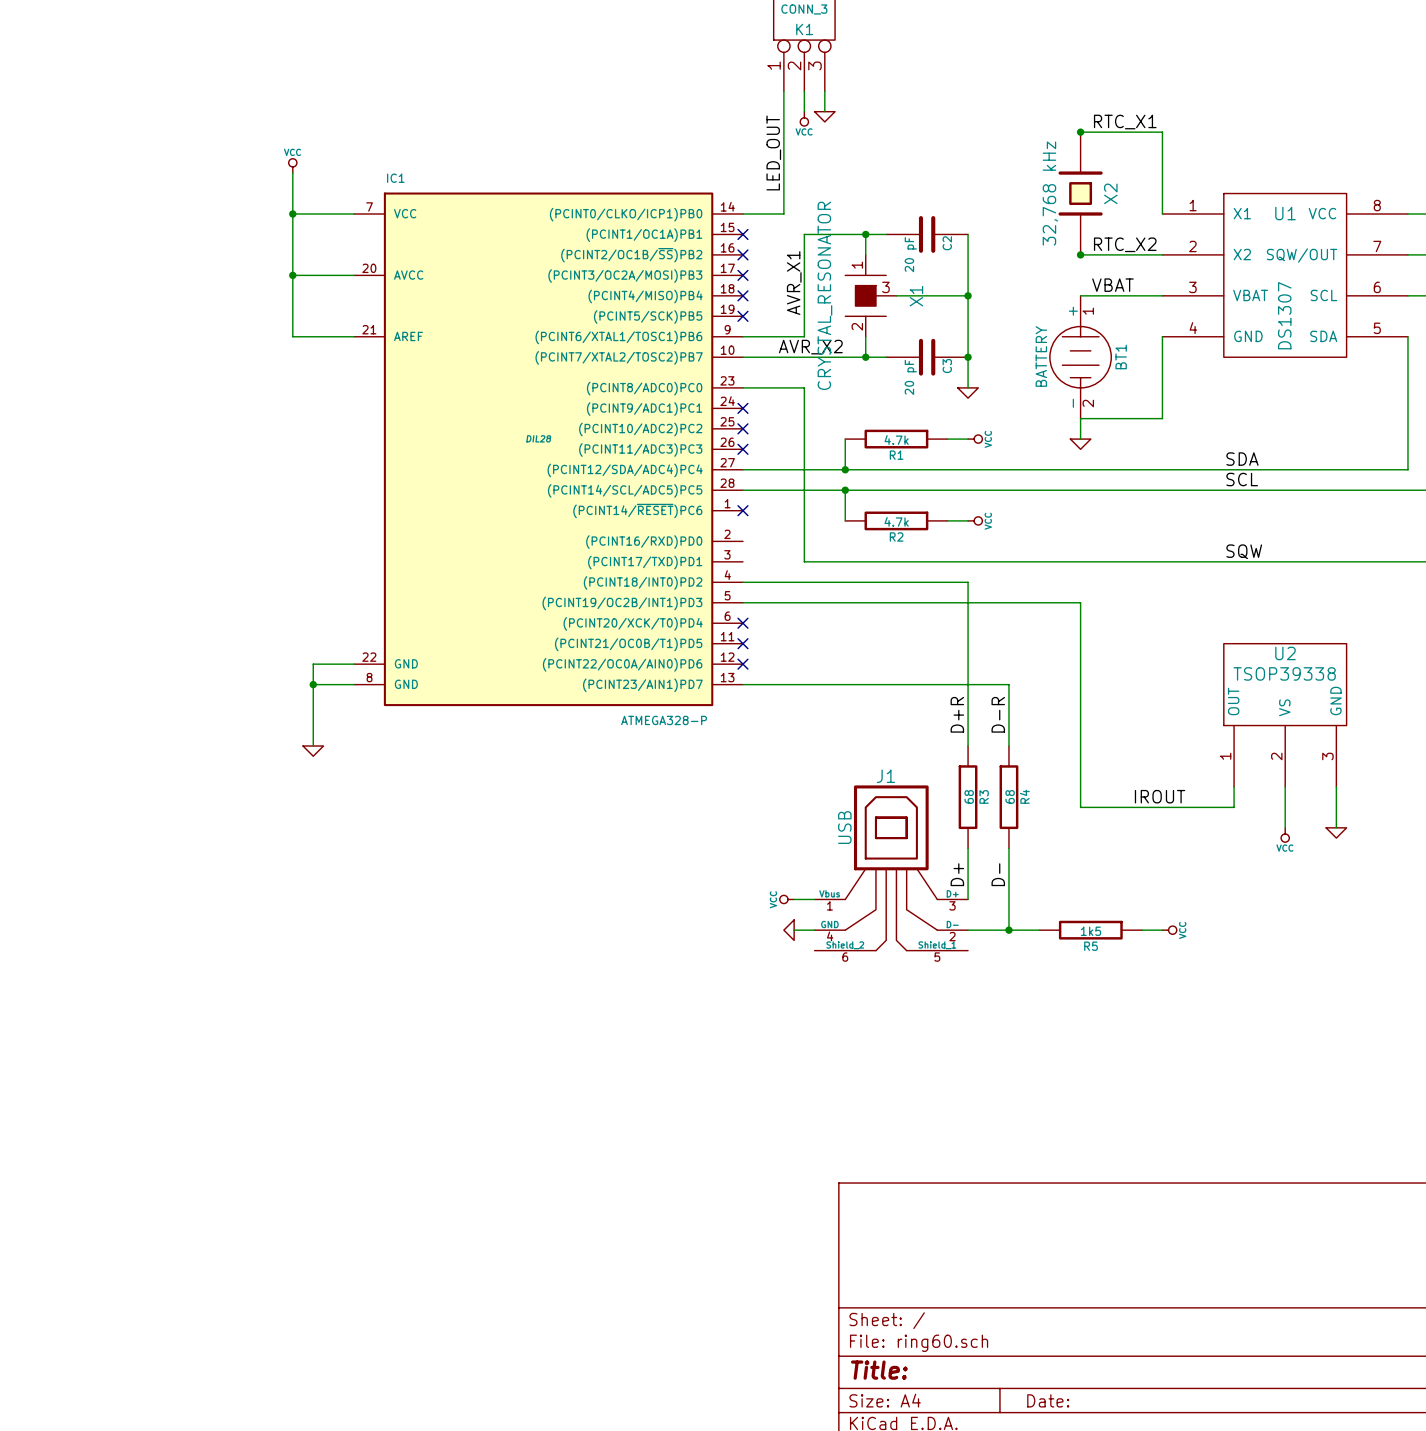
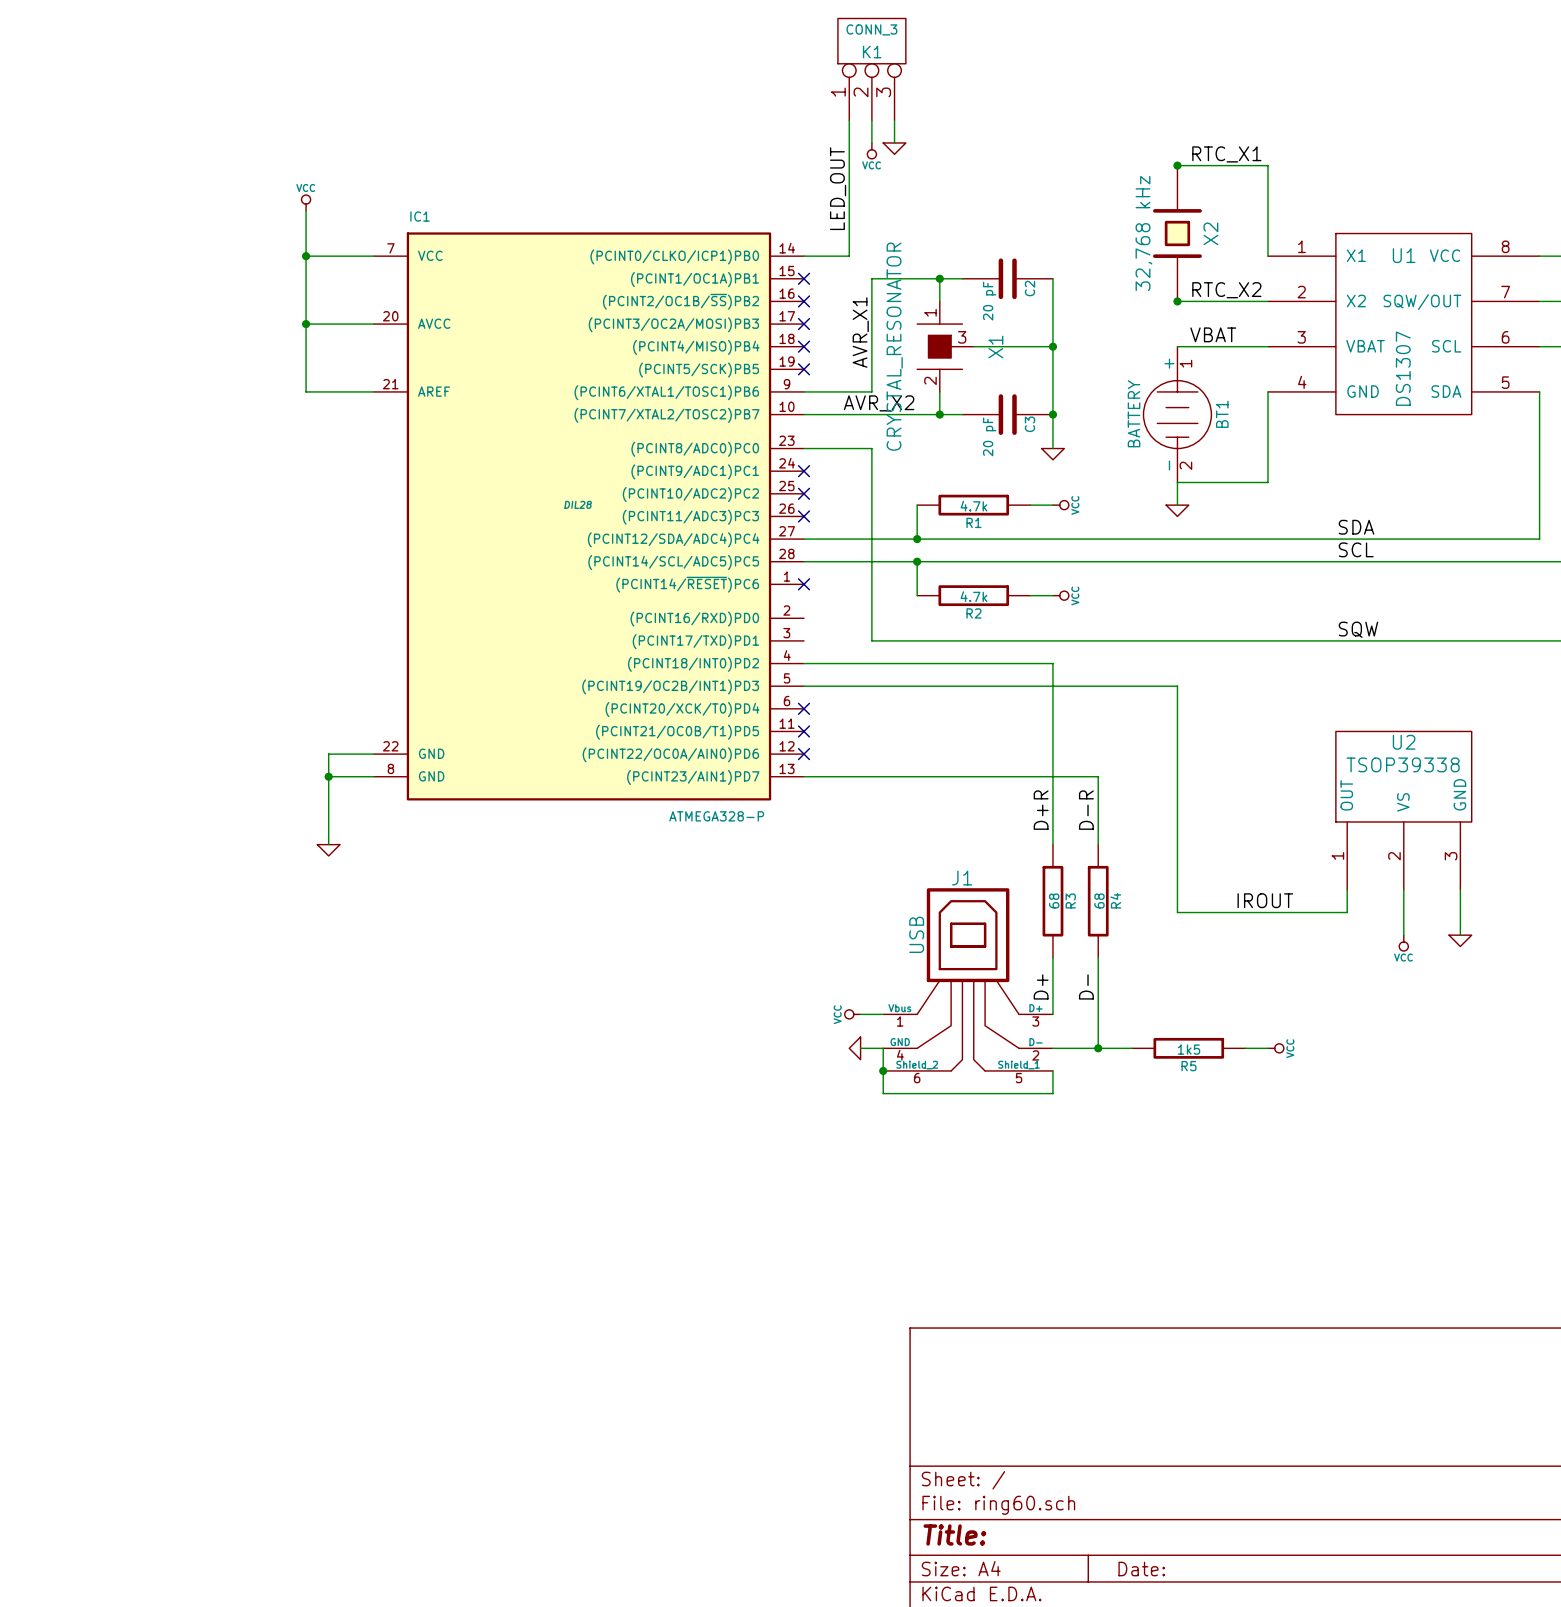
wire: none -> (883, 1048) (883, 1093) (1052, 1093) (1052, 1070)
junction: none -> (883, 1070)

